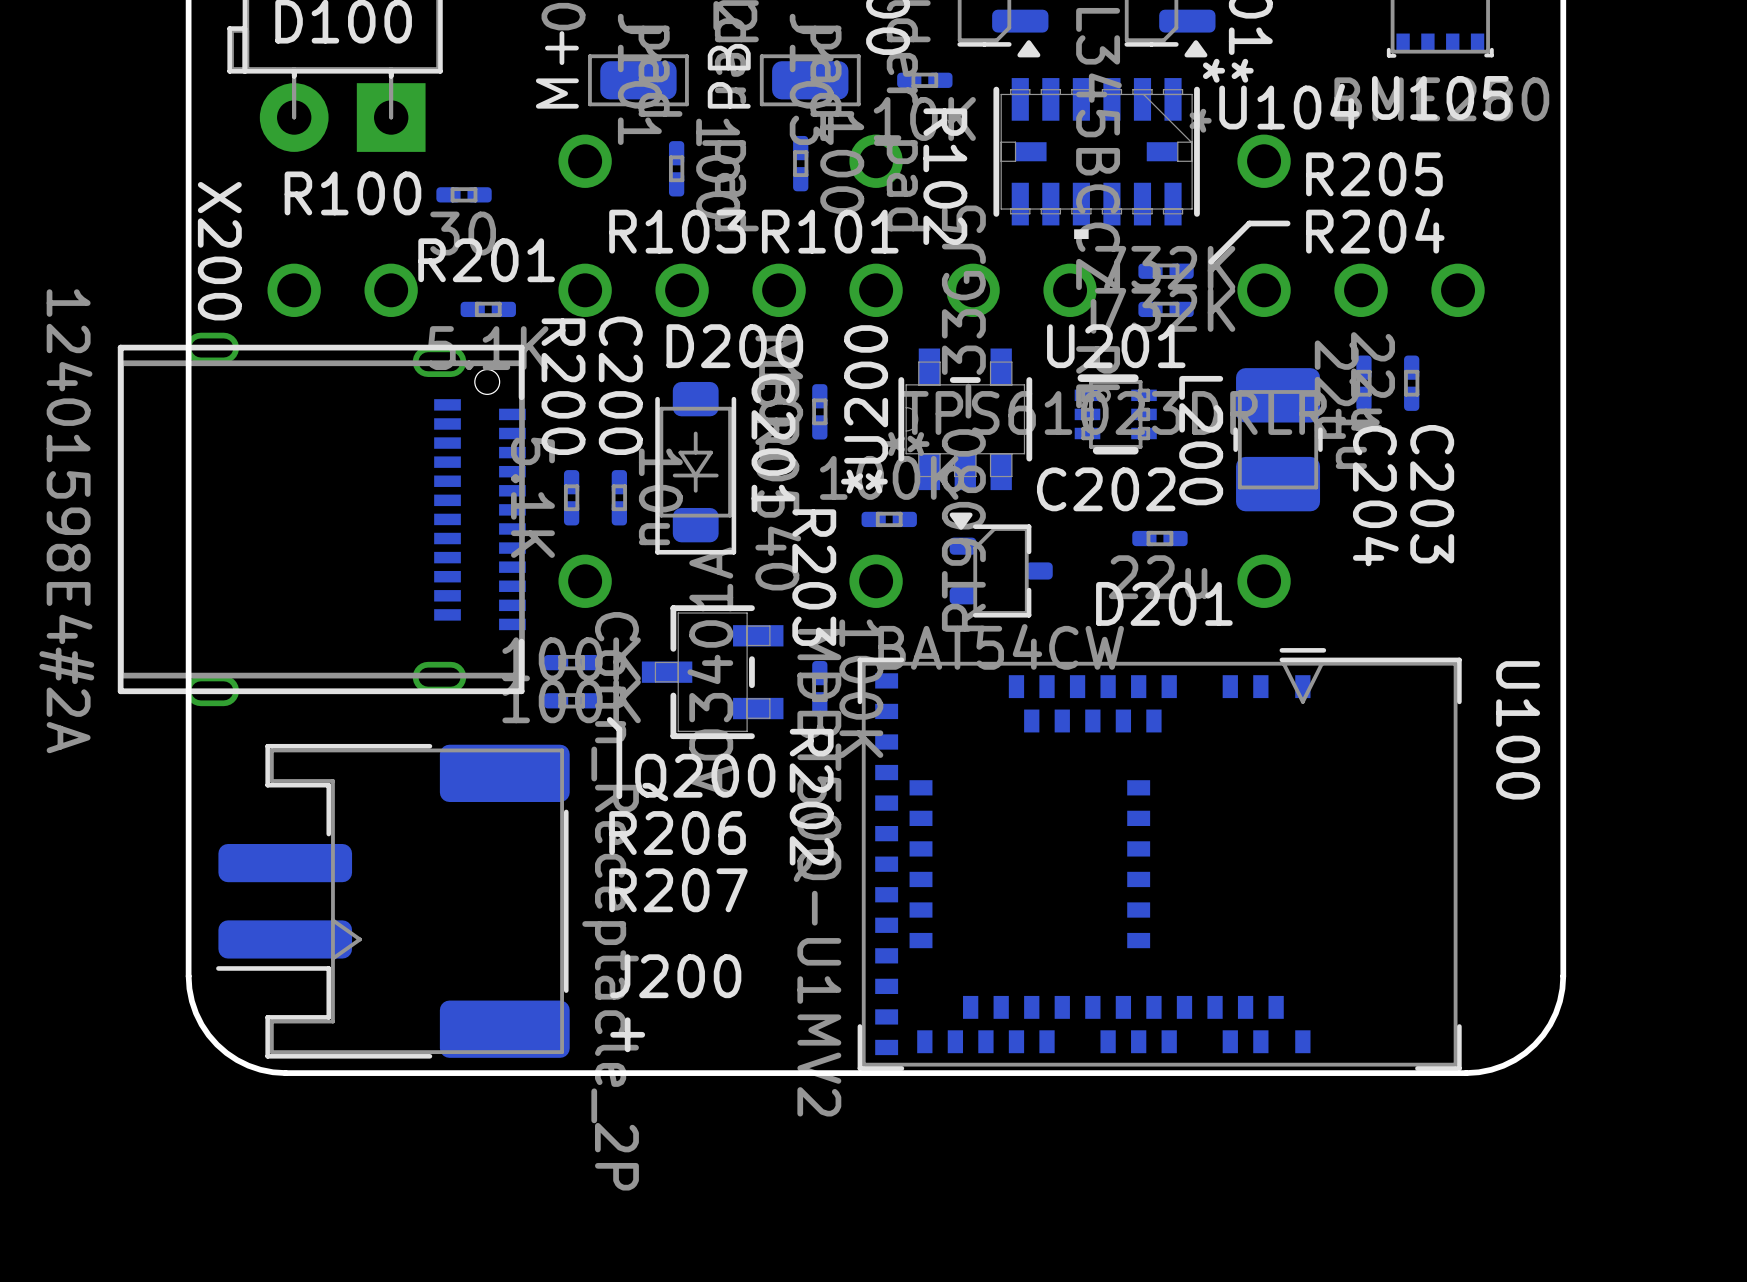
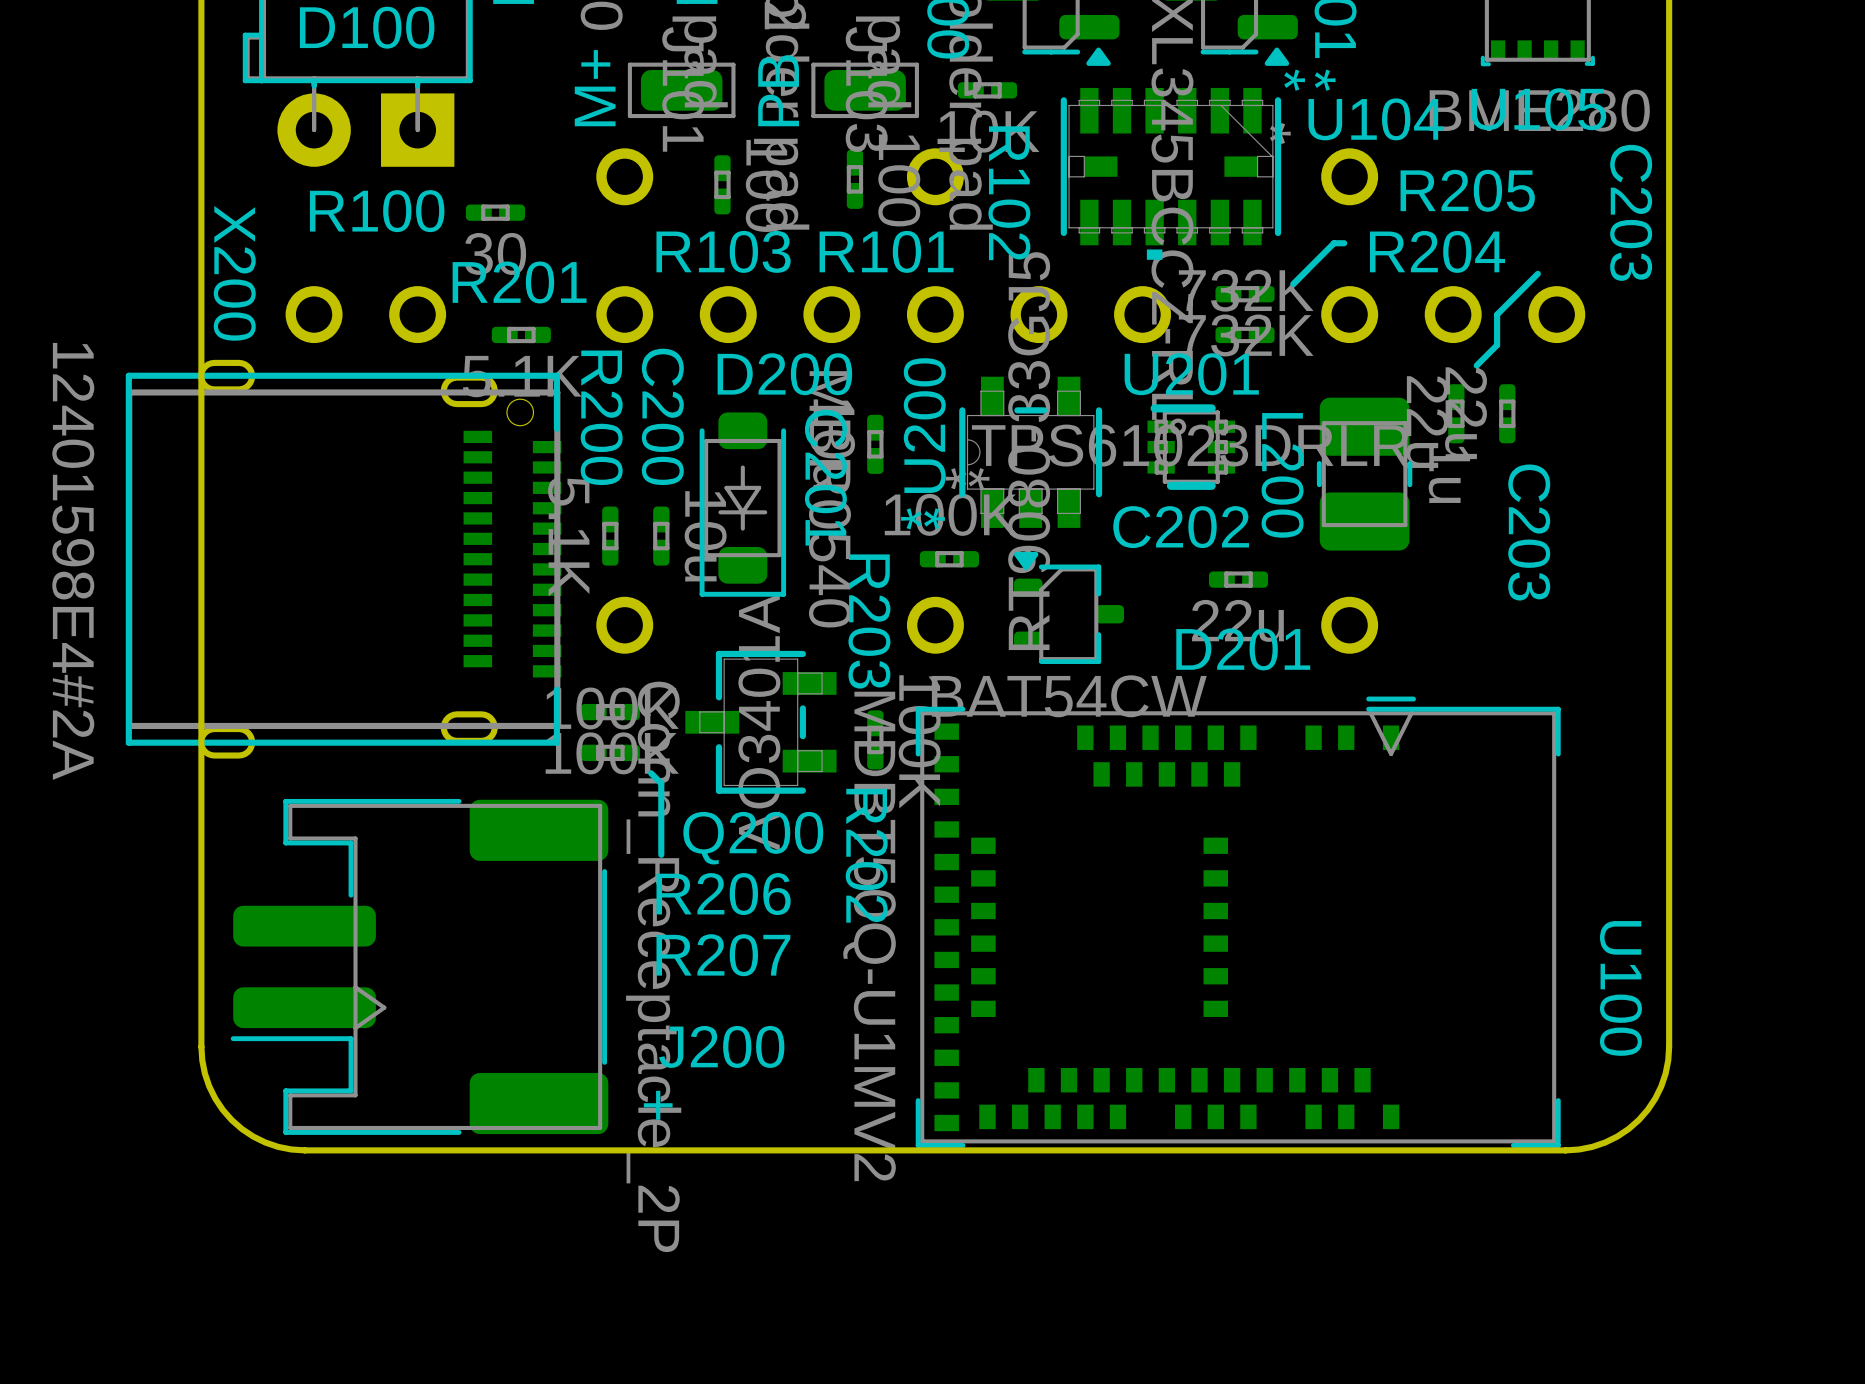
line: (1287, 223) (1258, 223) -> none
R204 name position: R204 (1375, 230) -> R204 (1437, 251)
line: none -> (1537, 273) (1497, 314) (1497, 345) (1476, 365)
C204 name: C204 (1375, 496) -> C203 (1631, 212)
U100 name position: U100 (1518, 730) -> U100 (1620, 988)

